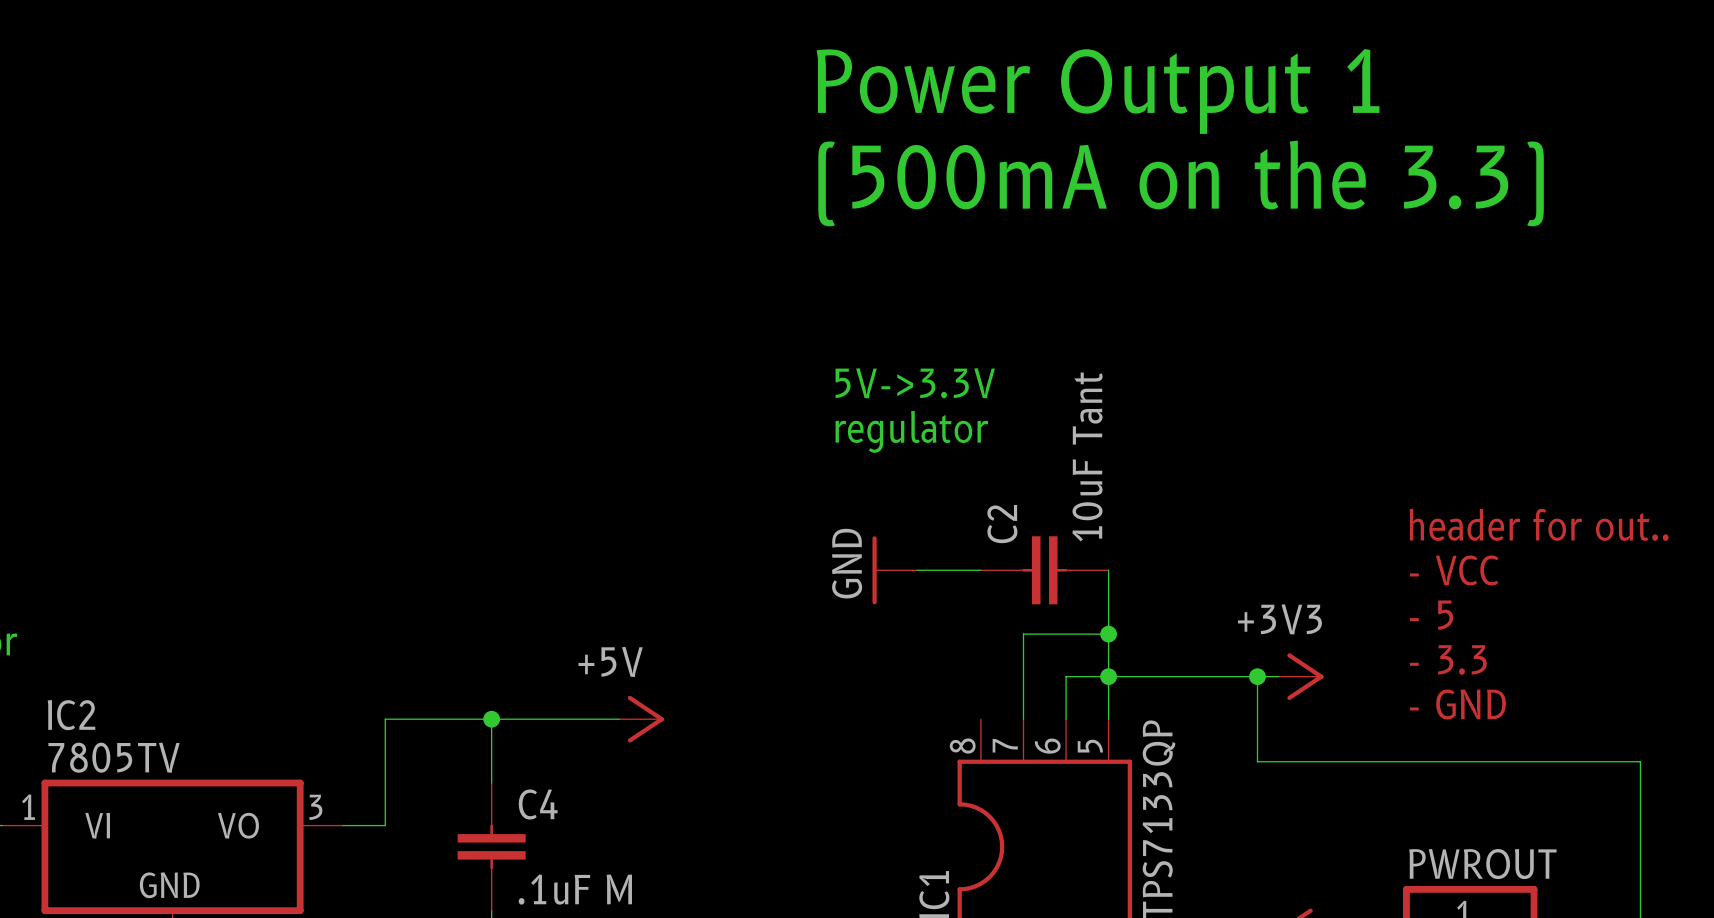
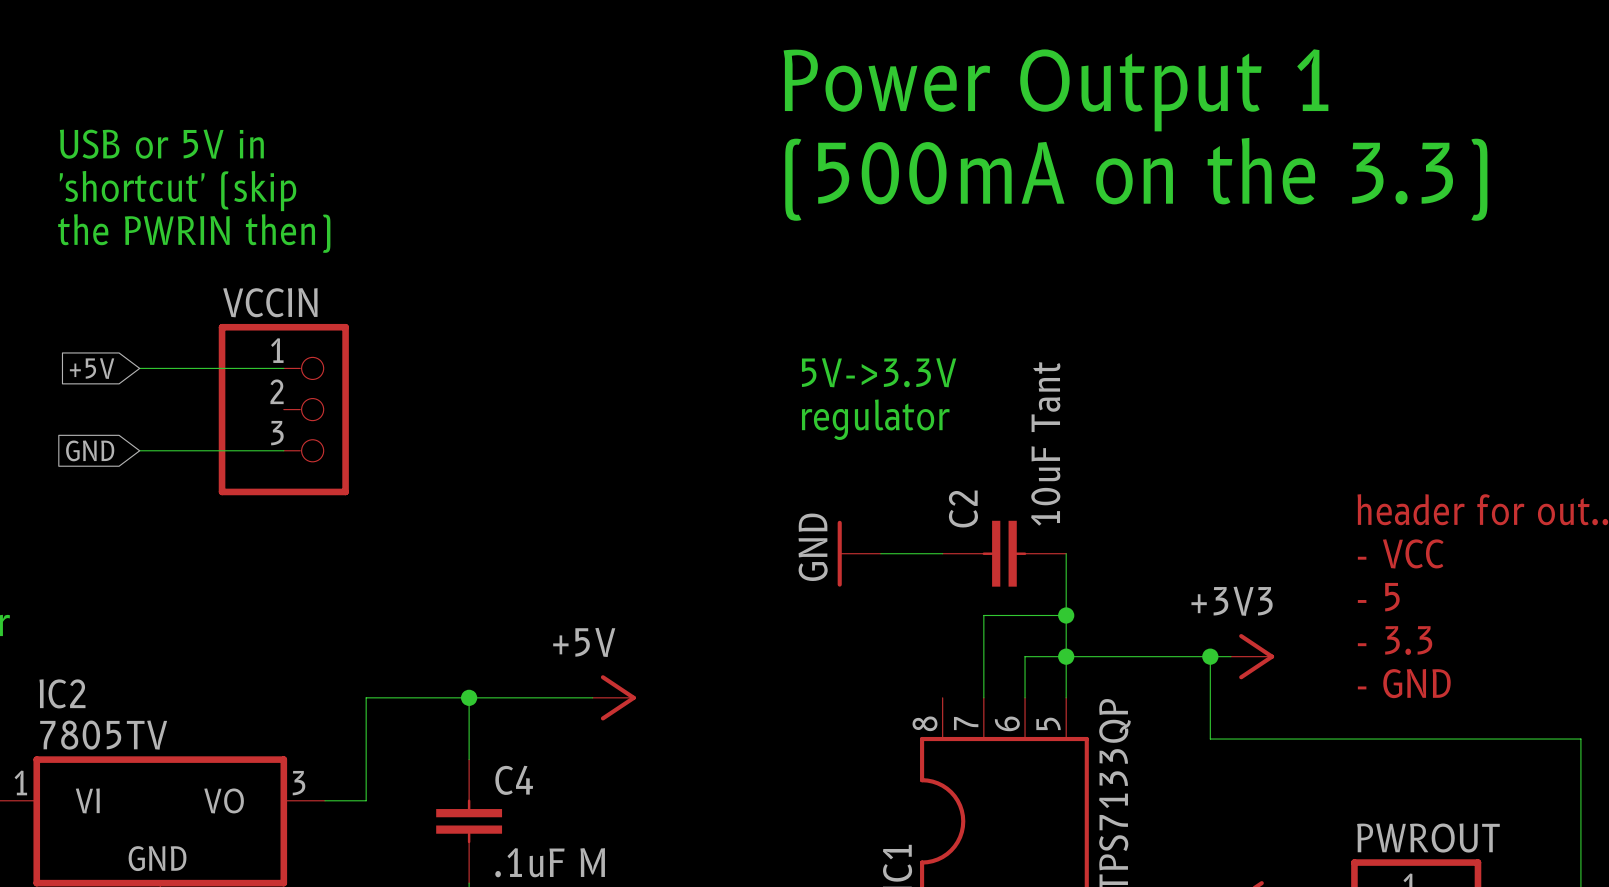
text: none -> USB or 5V in (161, 144)
text: none -> 'shortcut' (skip (178, 191)
text: none -> the PWRIN then) (194, 233)
global label: none -> +5V (92, 368)
wire: none -> (139, 368) (283, 368)
VCCIN: none -> (283, 409)
wire: none -> (139, 450) (283, 450)
global label: none -> GND (90, 450)

